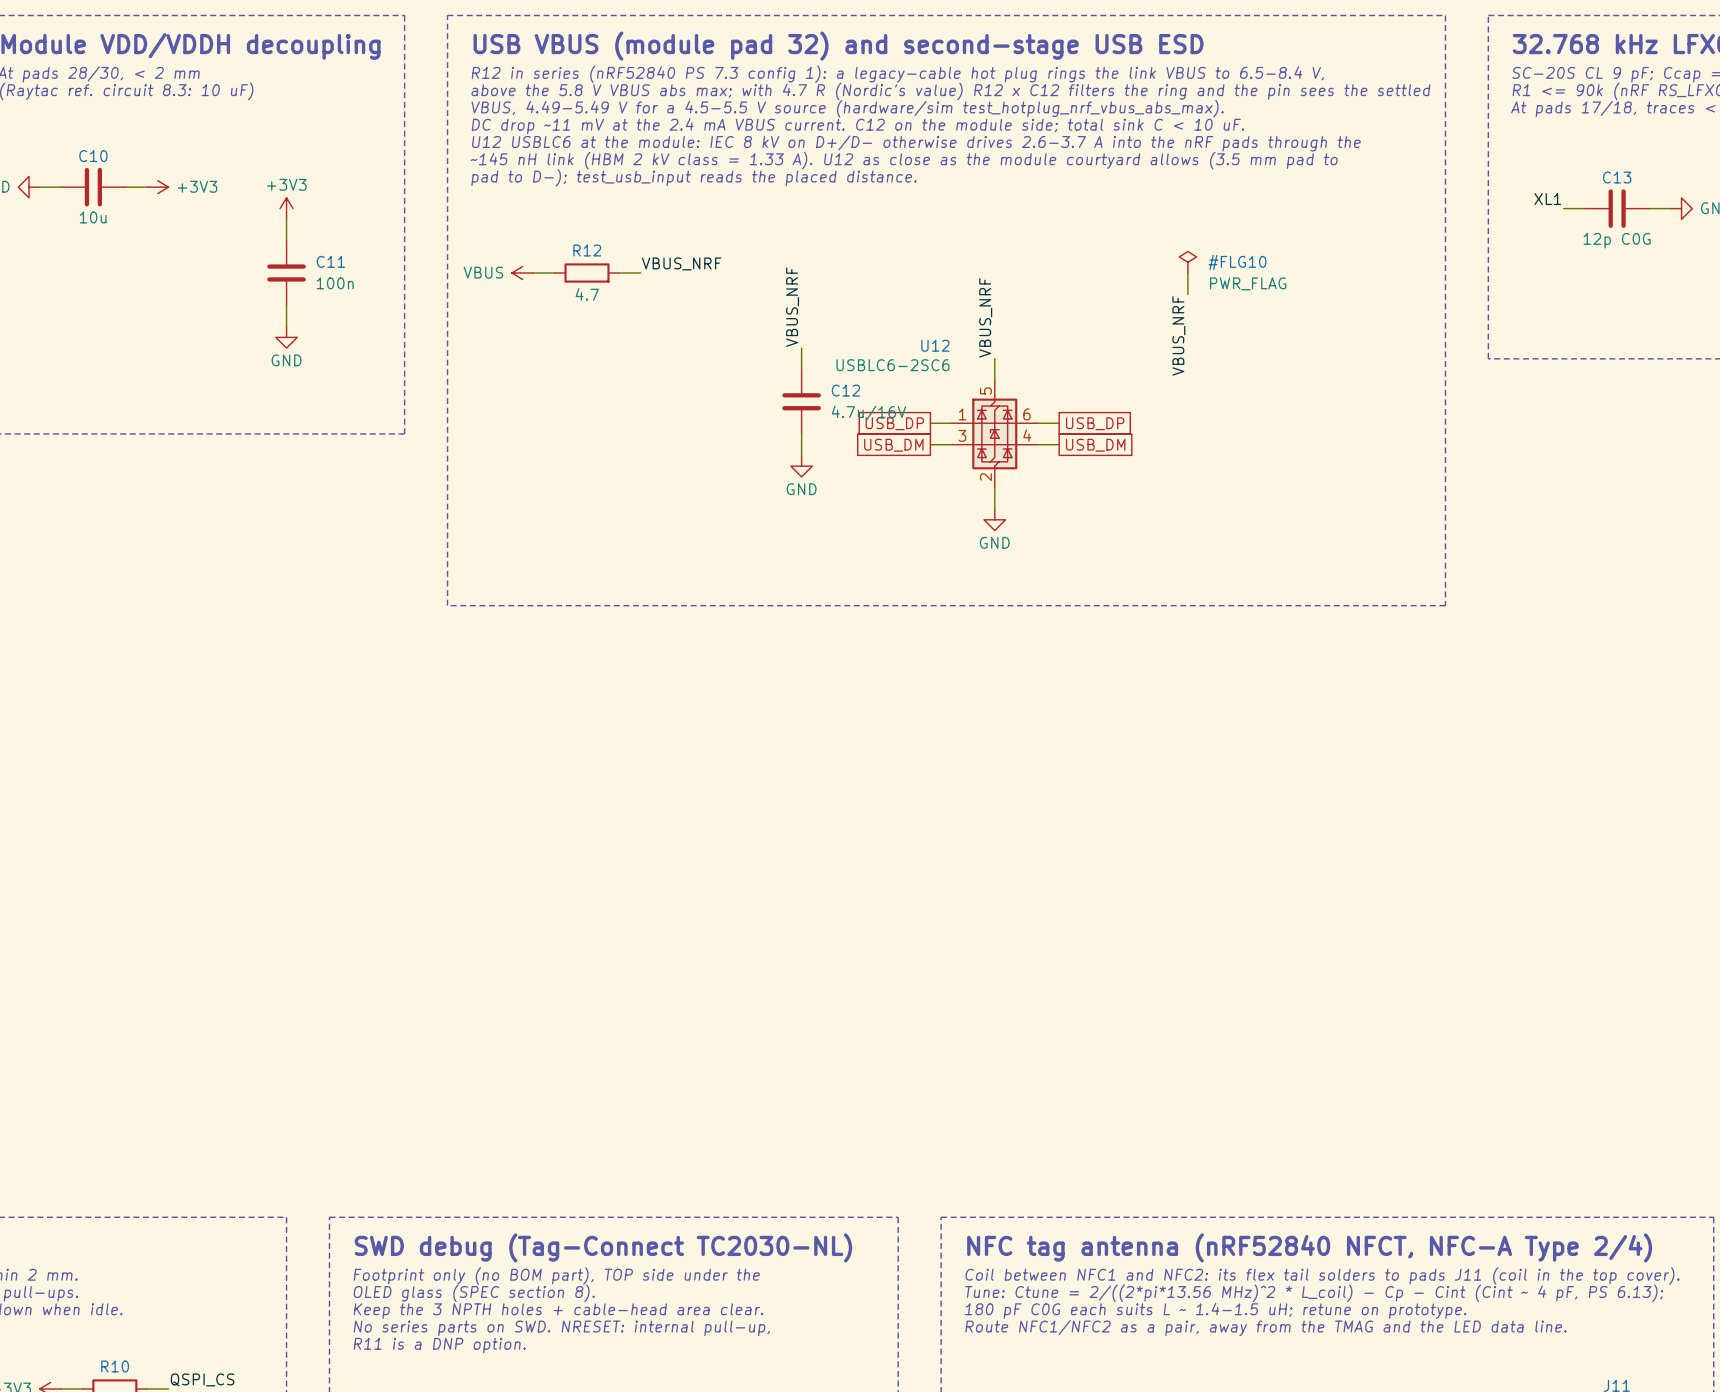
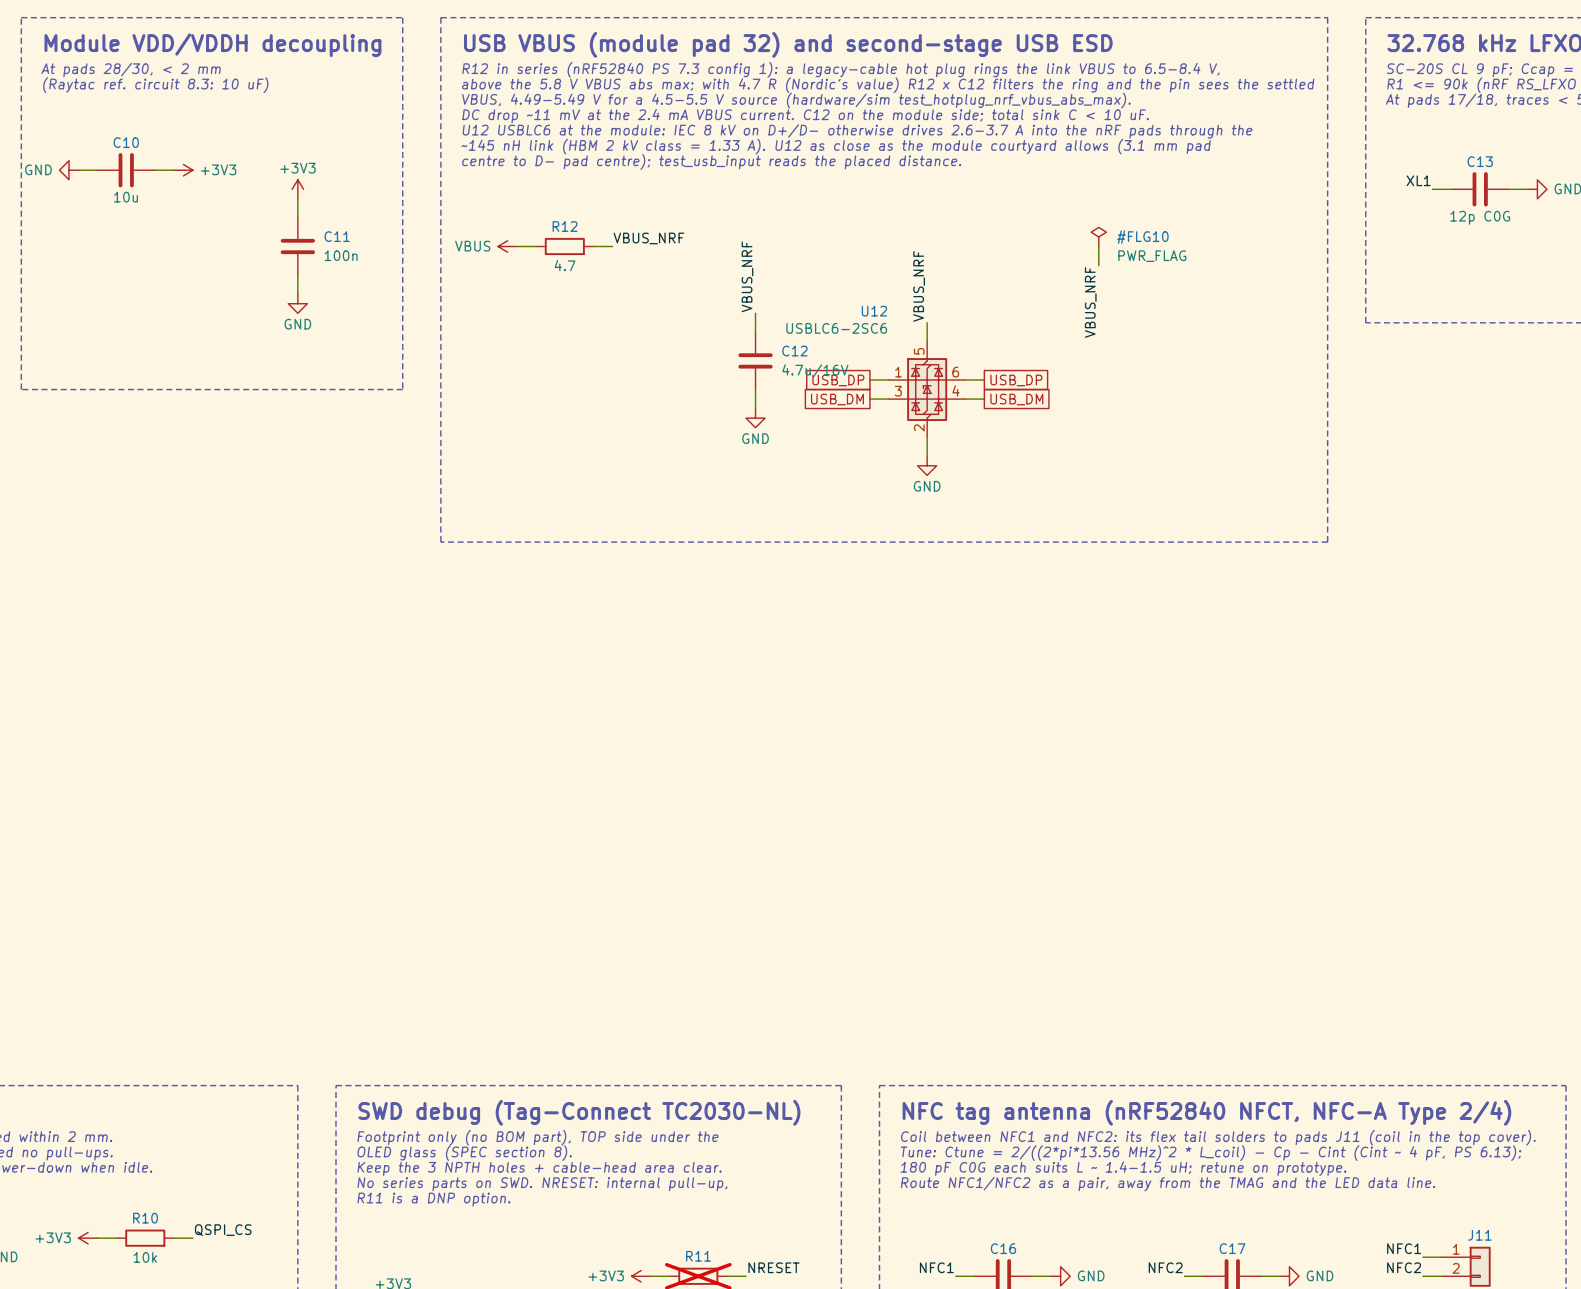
text: ~145 nH link (HBM 2 kV class = 1.33 A). U12 as close as the module courtyard allows (3.5 mm pad to (904, 160) -> ~145 nH link (HBM 2 kV class = 1.33 A). U12 as close as the module courtyard allows (3.1 mm pad (836, 146)
text: pad to D-); test_usb_input reads the placed distance. (693, 177) -> centre to D- pad centre); test_usb_input reads the placed distance. (711, 161)

